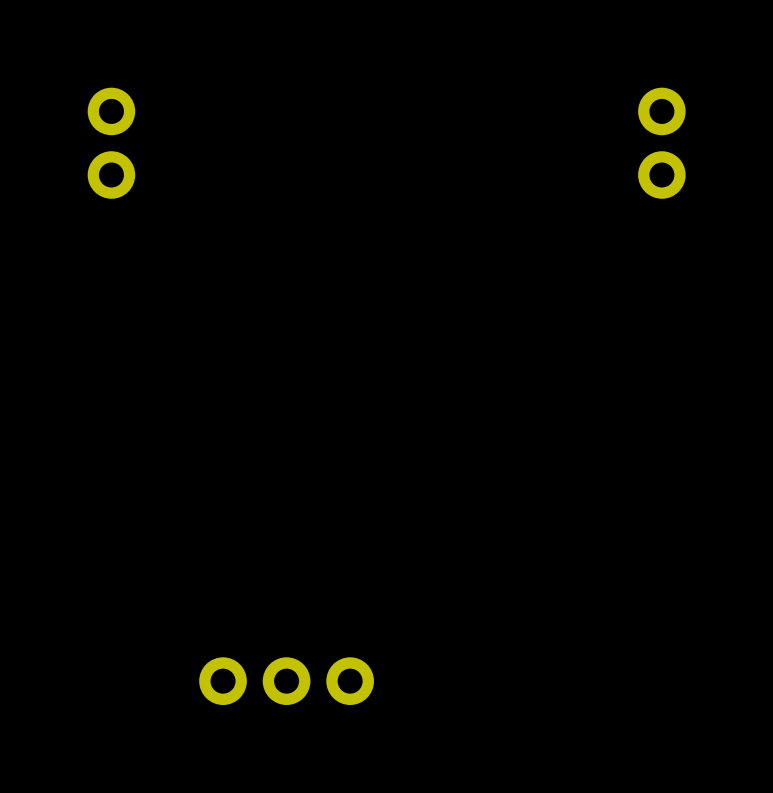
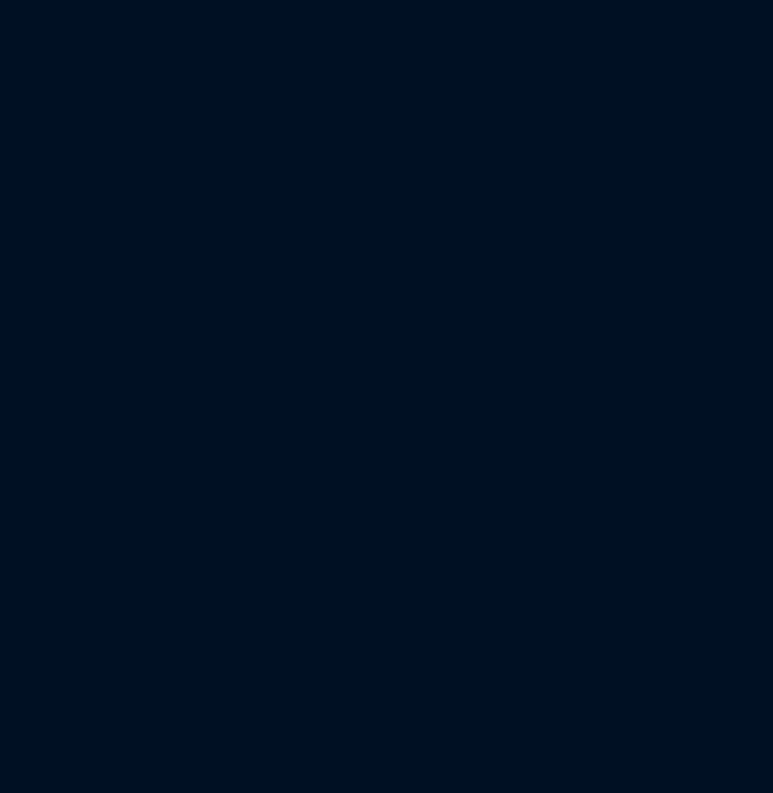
part: (111, 143) -> none
part: (661, 143) -> none
part: (286, 681) -> none

